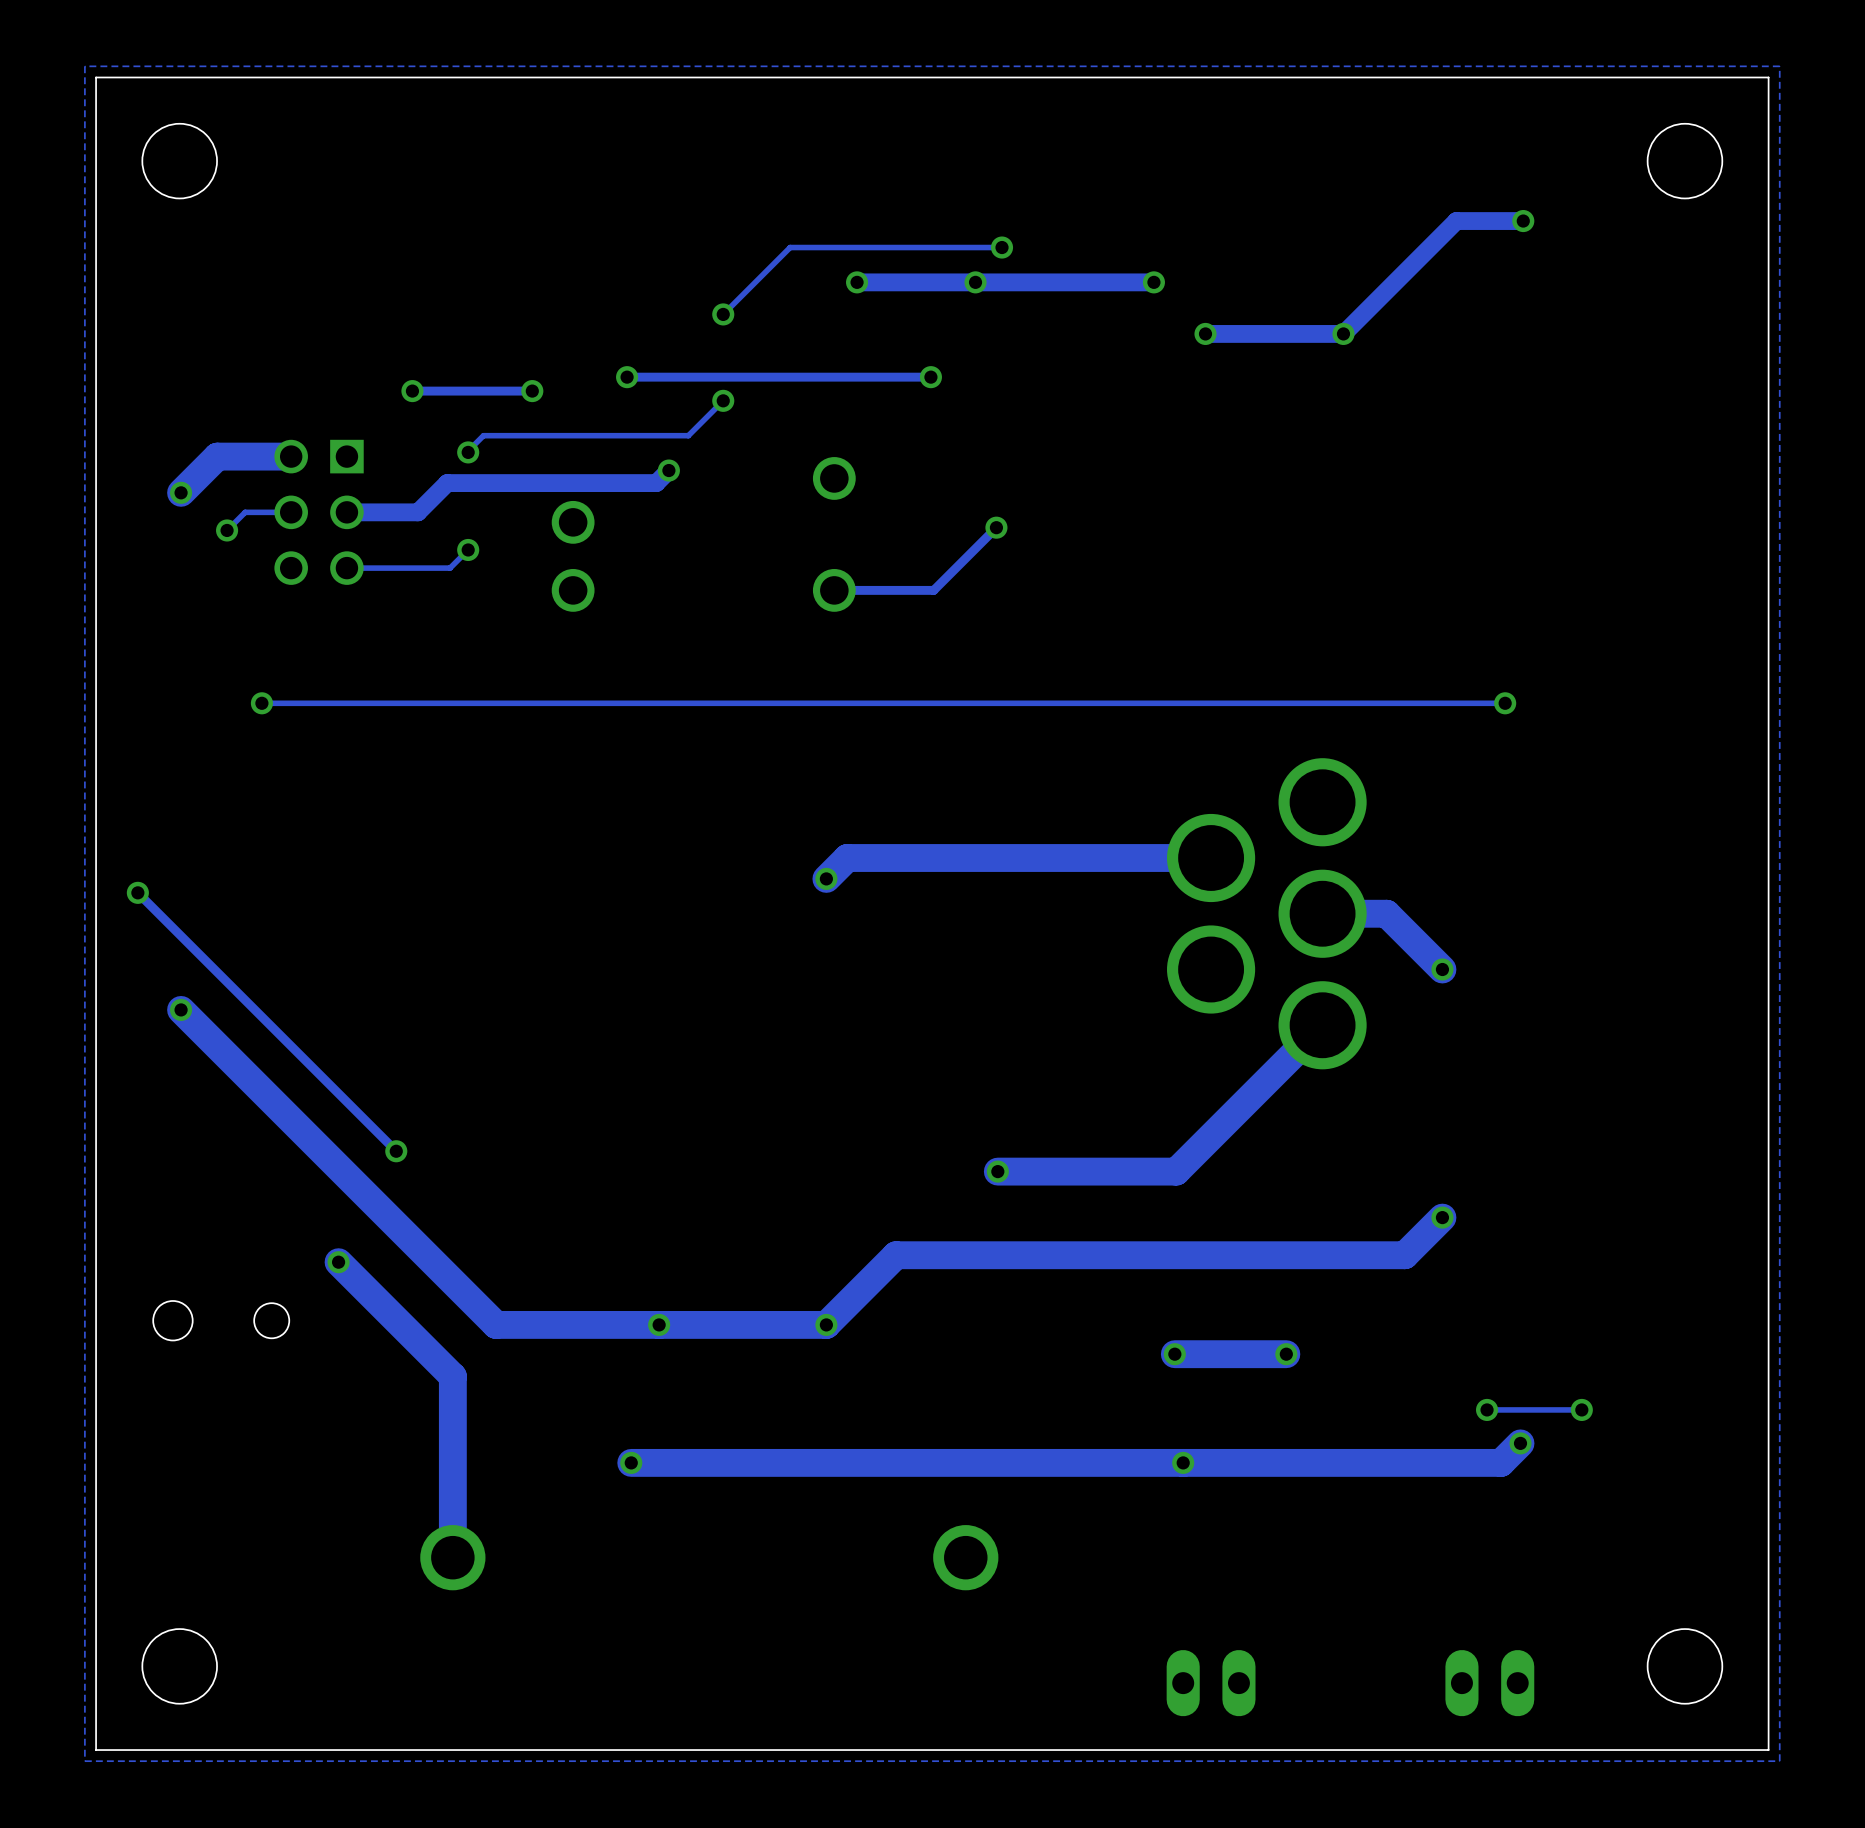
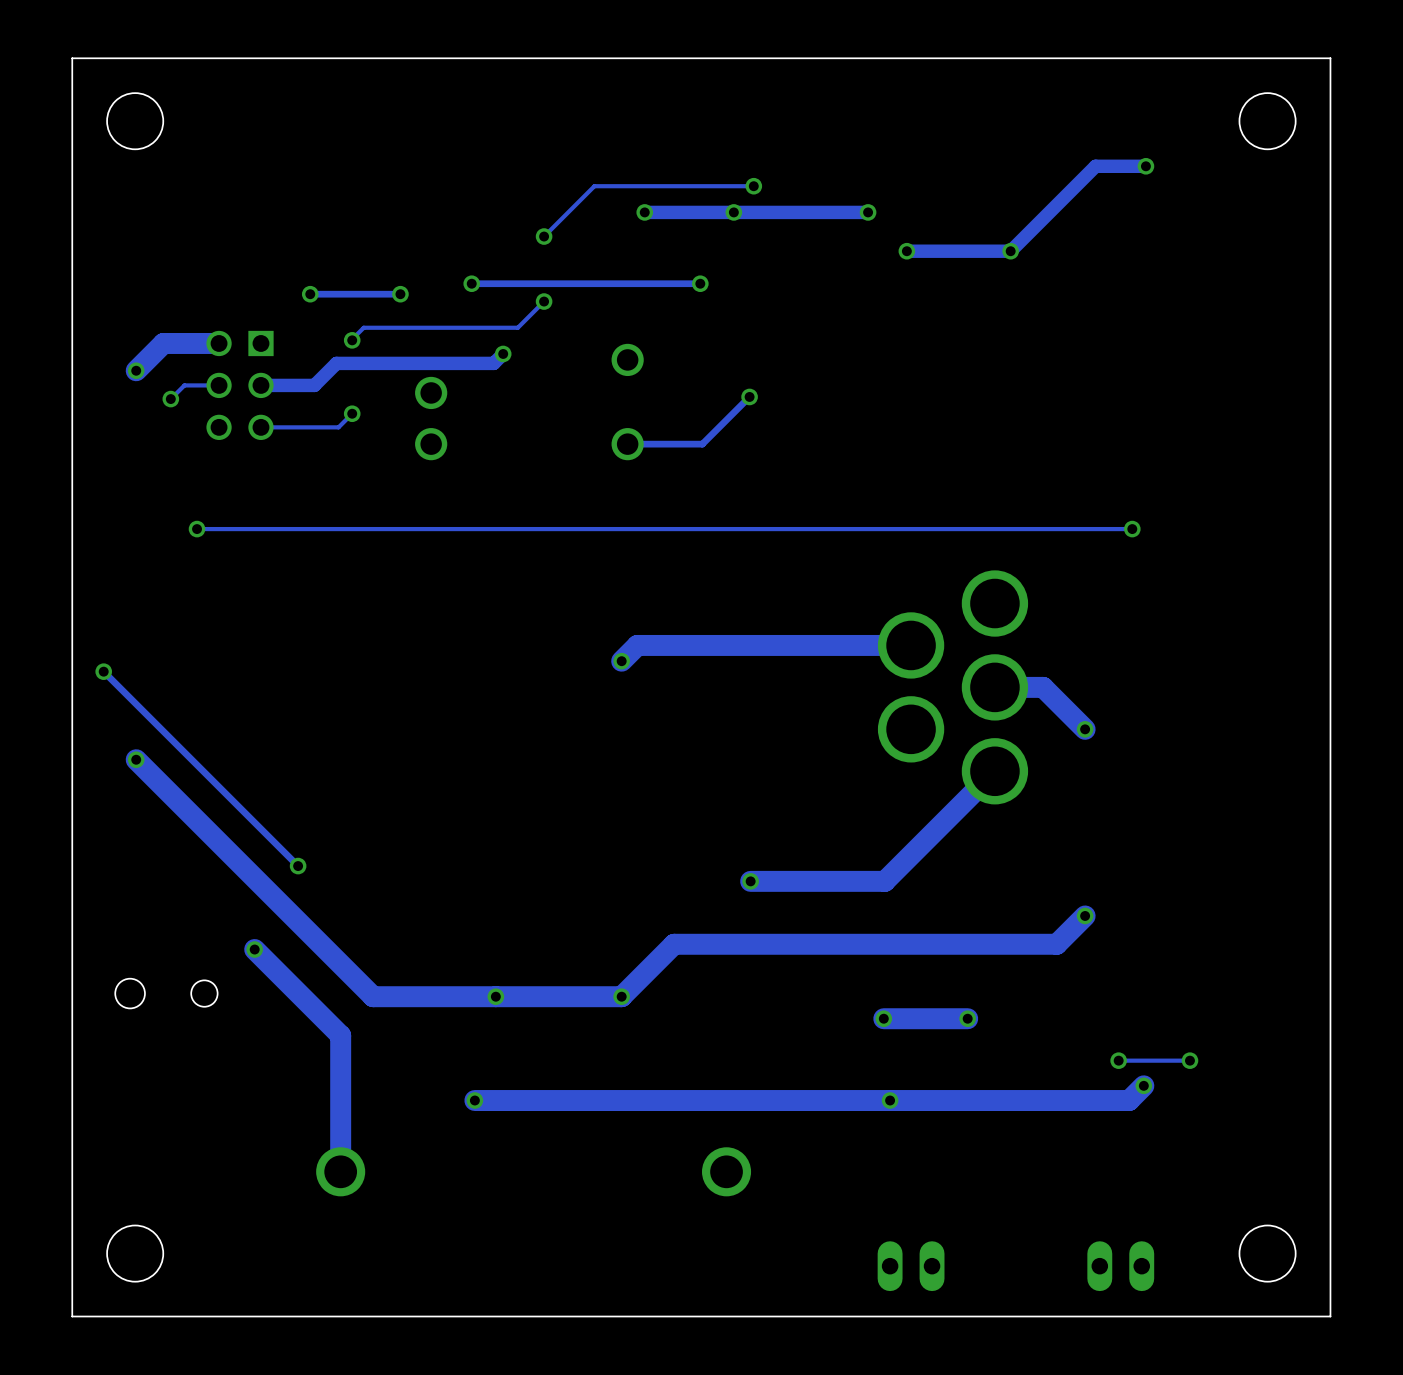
zone outline: (1779, 66) (84, 66) (84, 1761) (1779, 1761) (1779, 66) -> none

